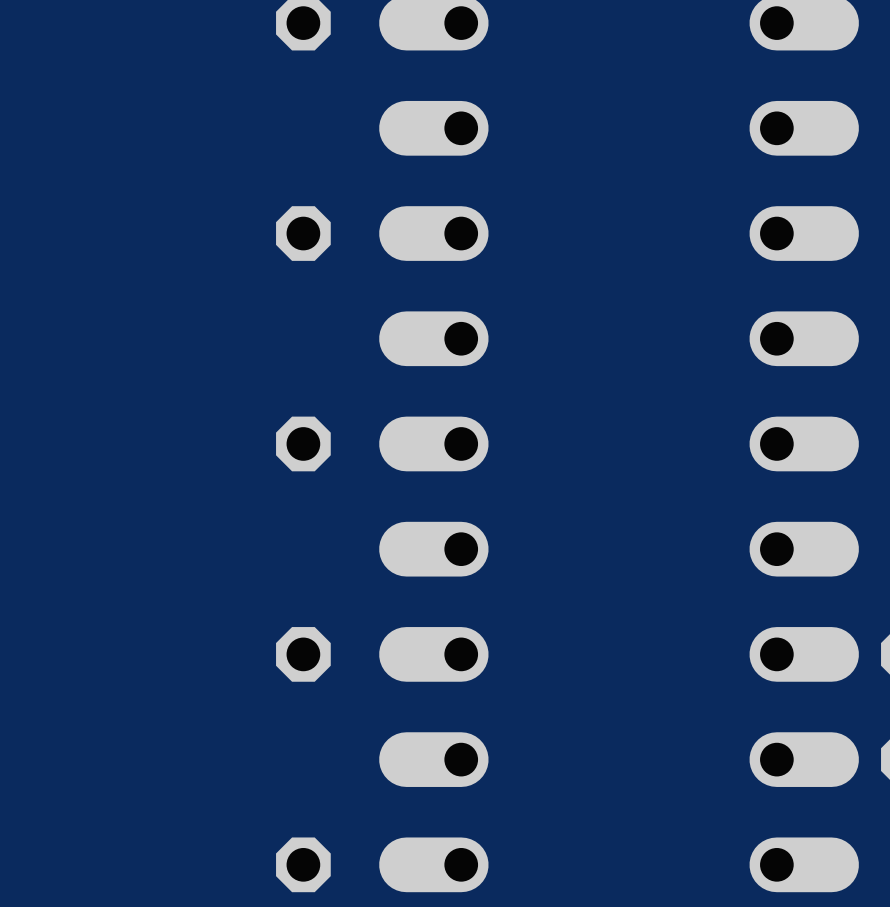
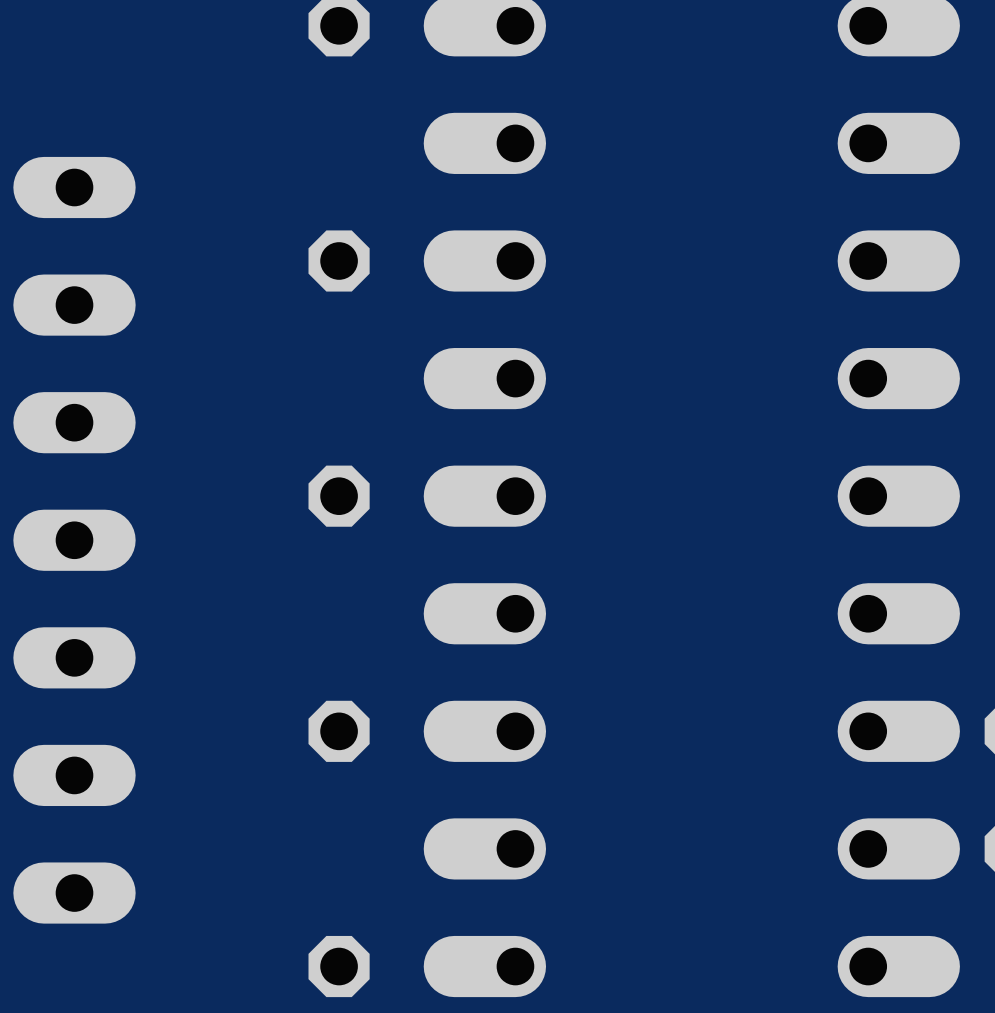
part: none -> (74, 540)

